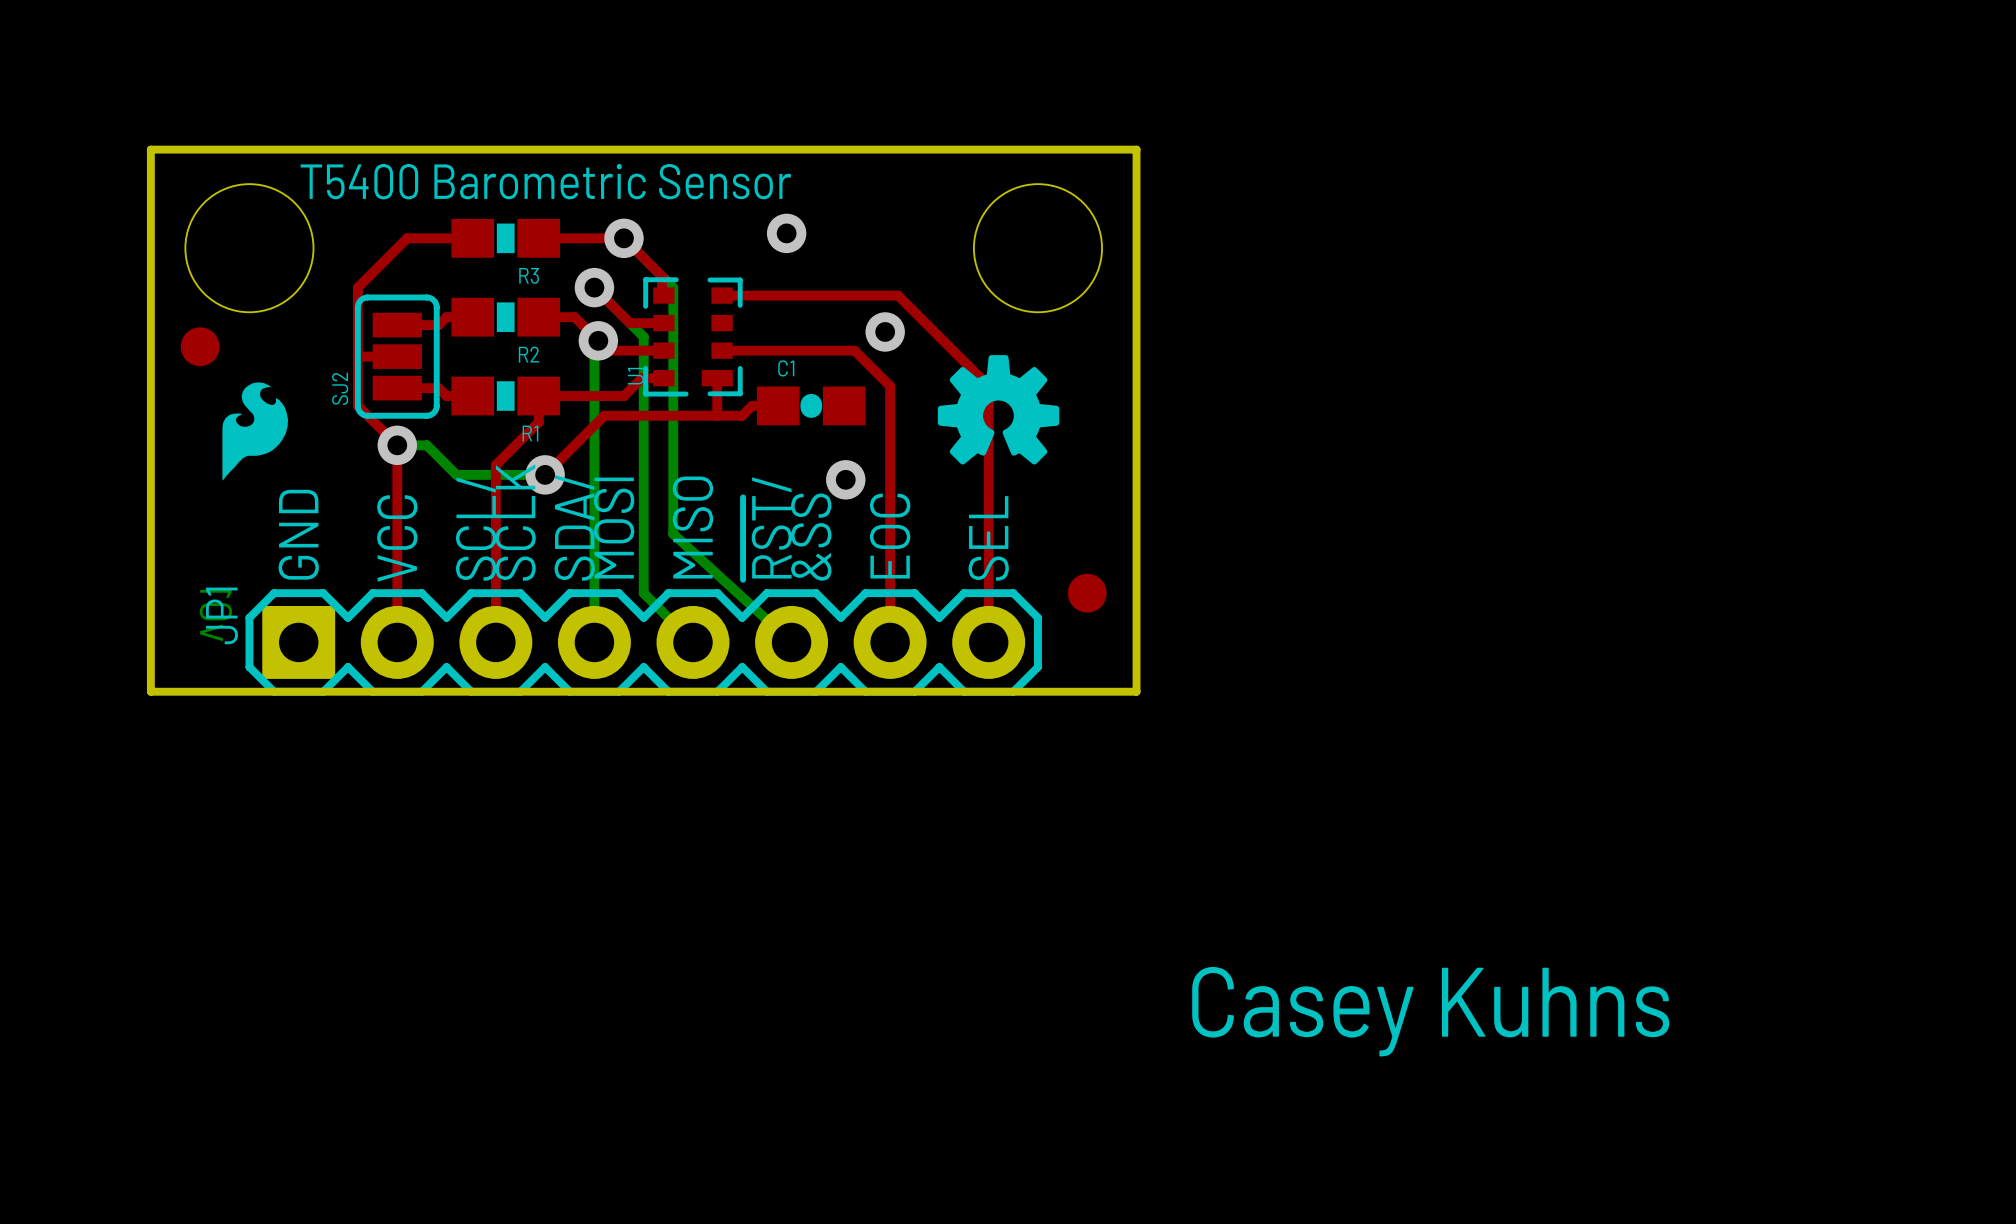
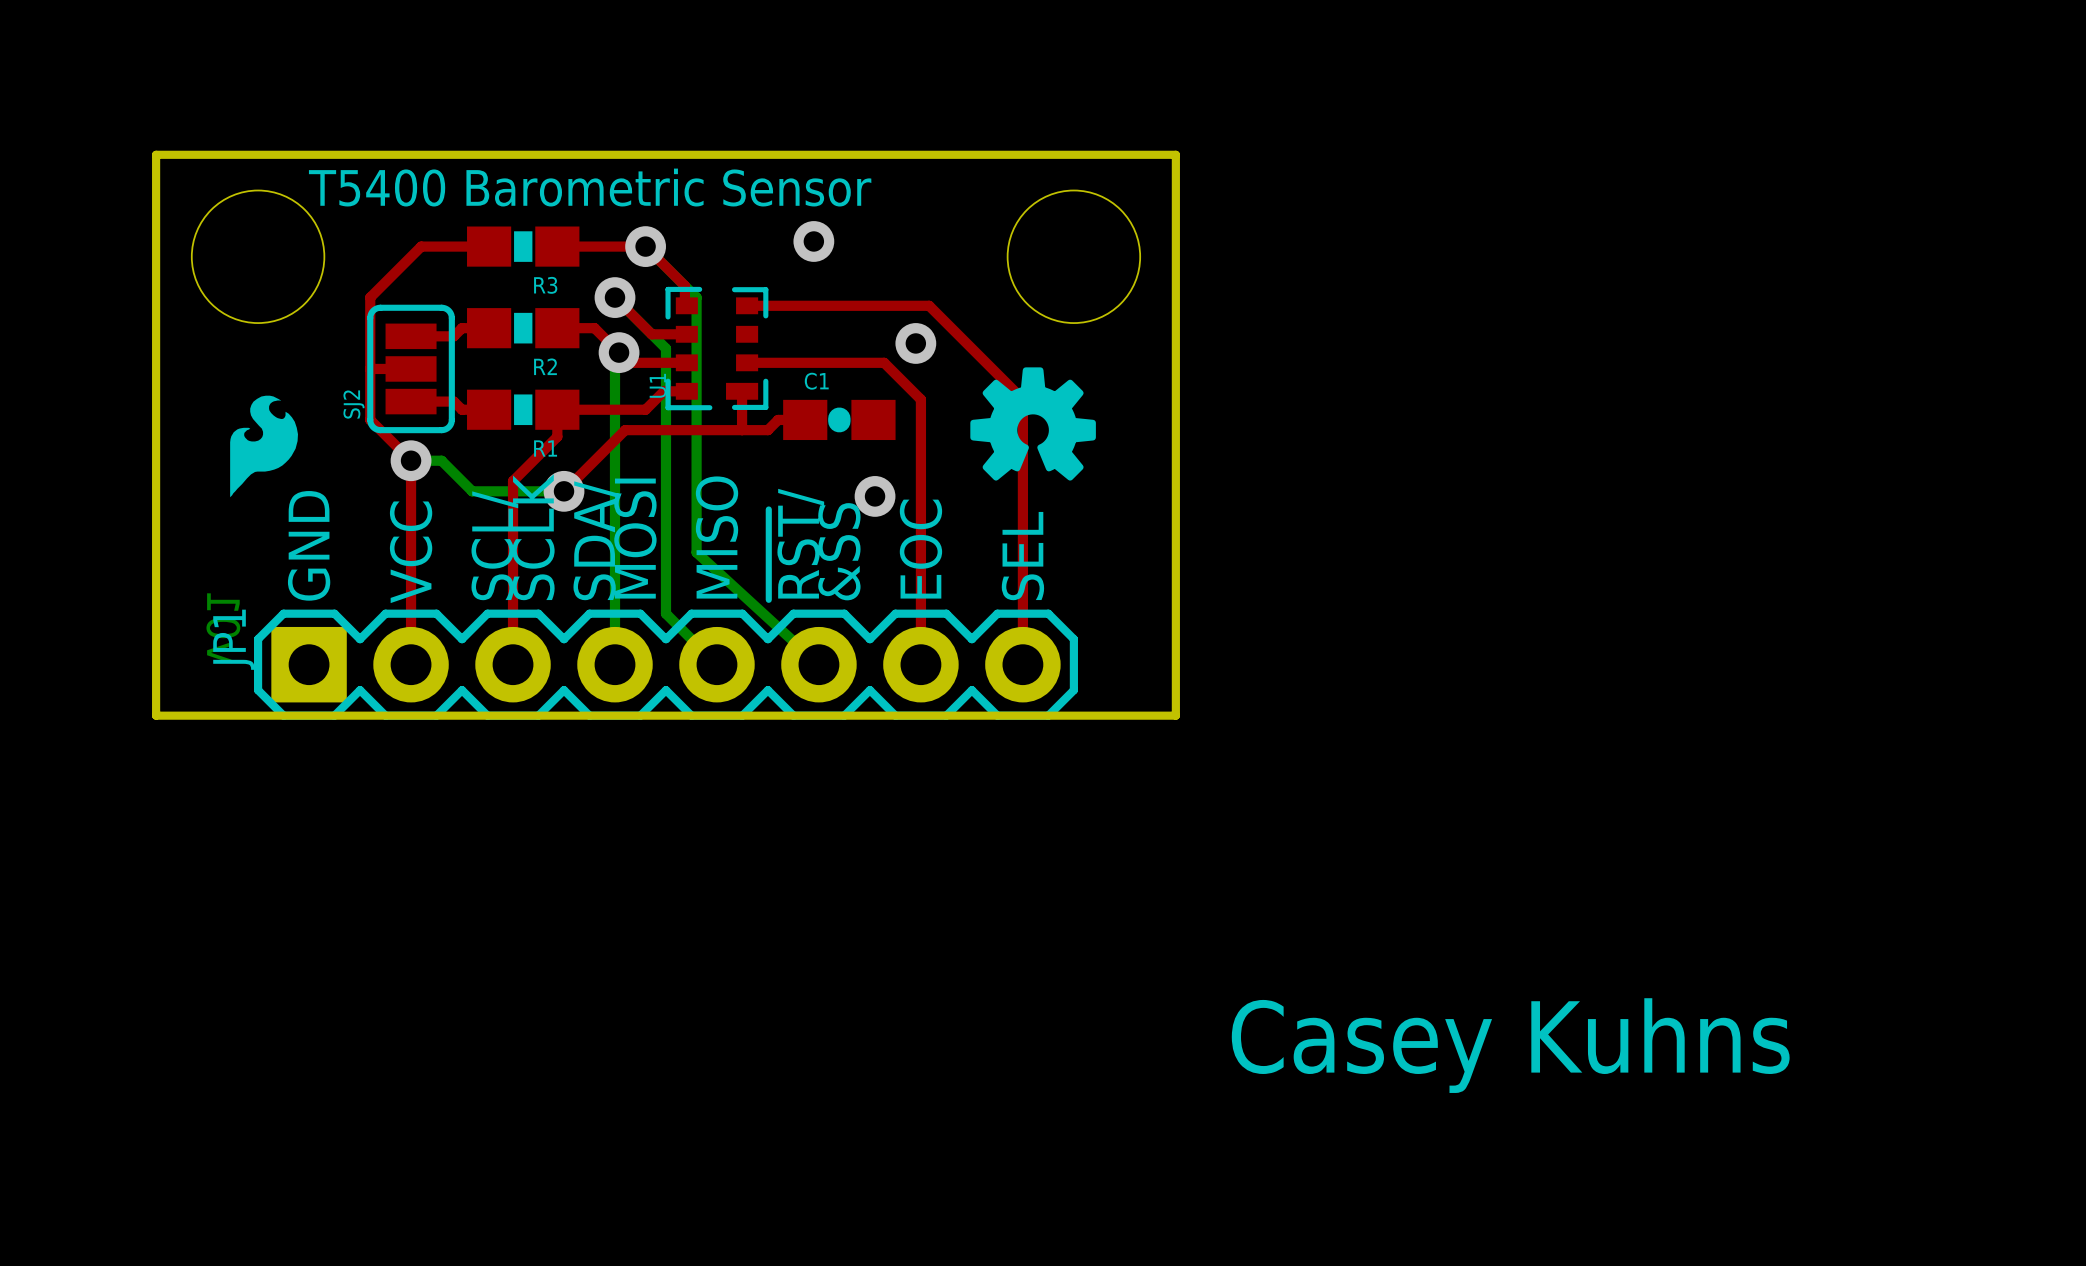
part: (200, 346) -> none
part: (1087, 593) -> none

